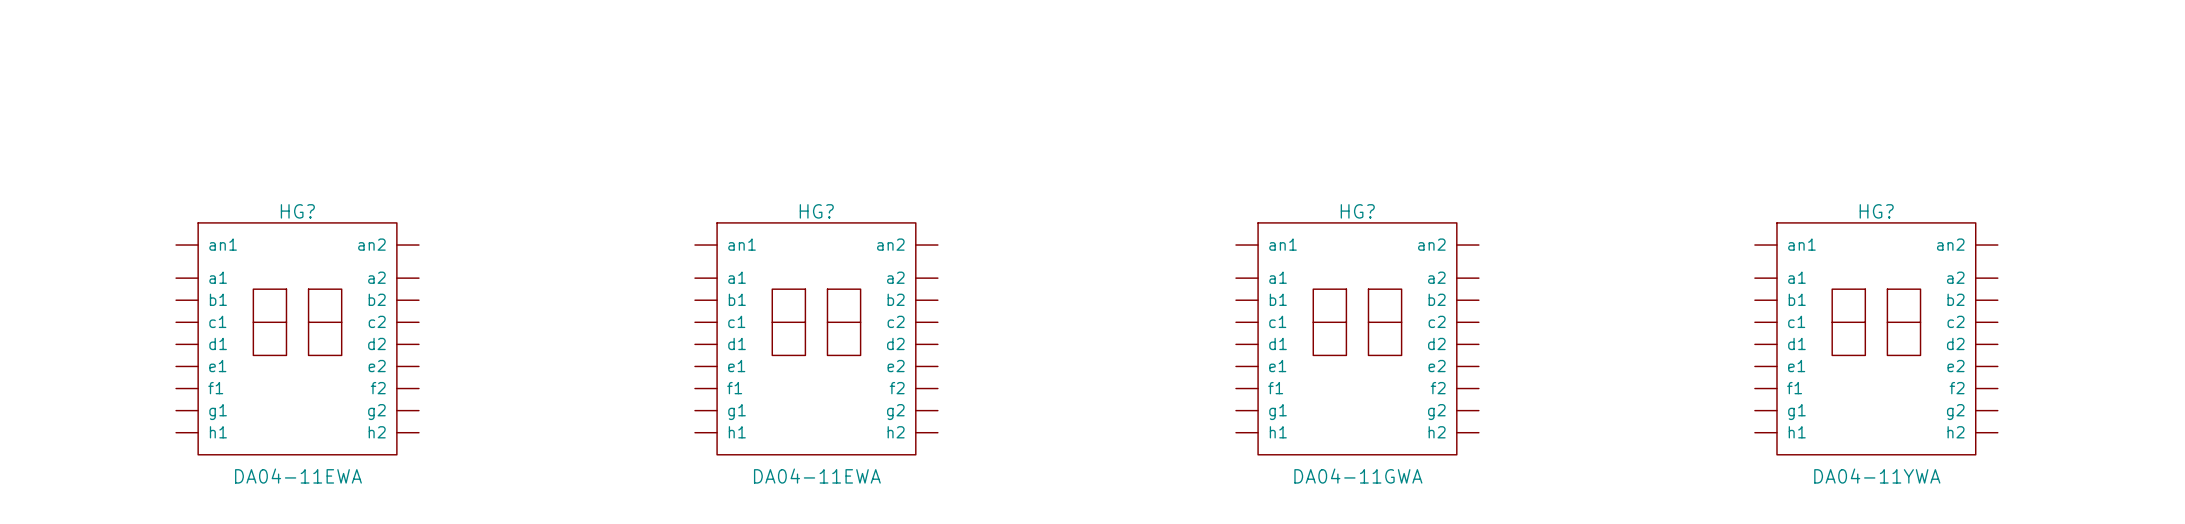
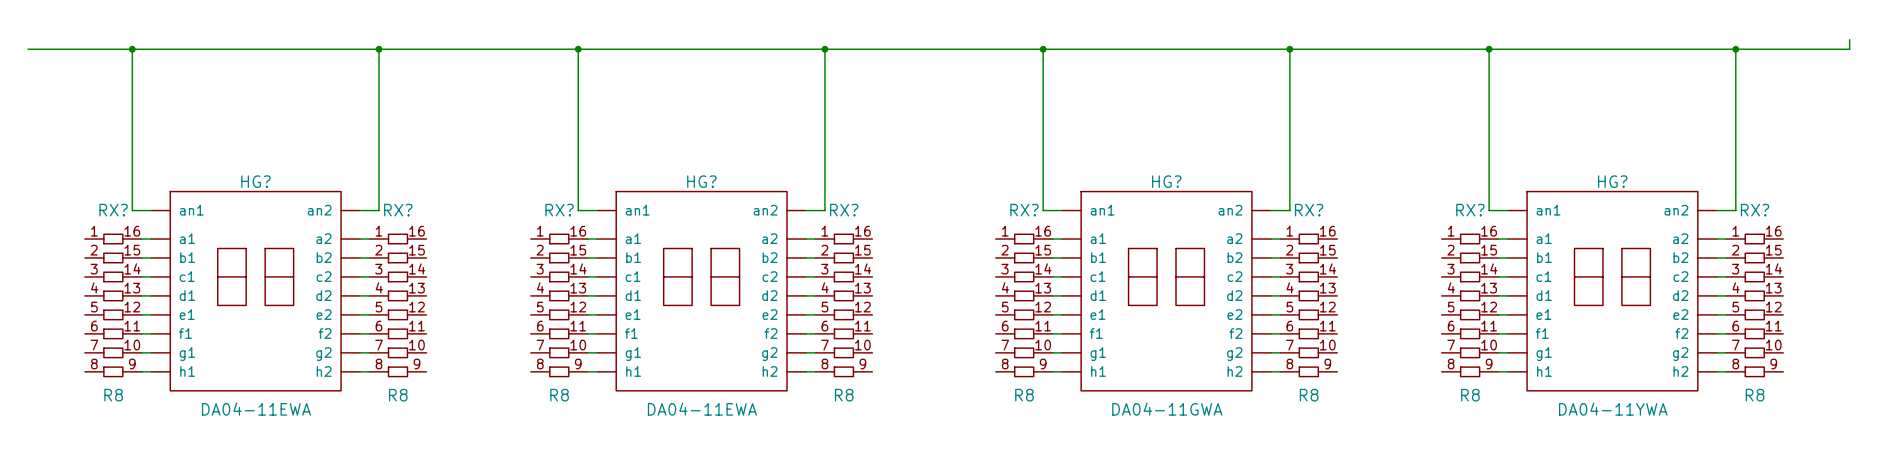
wire: none -> (1849, 39) (1849, 49) (27, 49)
wire: none -> (132, 49) (132, 210) (151, 210)
junction: none -> (132, 49)
wire: none -> (379, 49) (379, 210) (360, 210)
junction: none -> (379, 49)
wire: none -> (578, 49) (578, 210) (597, 210)
junction: none -> (578, 49)
wire: none -> (824, 49) (824, 210) (805, 210)
junction: none -> (824, 49)
wire: none -> (1043, 49) (1043, 210) (1062, 210)
junction: none -> (1043, 49)
wire: none -> (1289, 49) (1289, 210) (1270, 210)
junction: none -> (1289, 49)
wire: none -> (1489, 49) (1489, 210) (1508, 210)
junction: none -> (1489, 49)
wire: none -> (1735, 49) (1735, 210) (1716, 210)
junction: none -> (1735, 49)
wire: none -> (141, 239) (151, 239)
wire: none -> (360, 239) (369, 239)
wire: none -> (587, 239) (597, 239)
wire: none -> (805, 239) (815, 239)
wire: none -> (1052, 239) (1062, 239)
wire: none -> (1270, 239) (1280, 239)
wire: none -> (1498, 239) (1508, 239)
wire: none -> (1716, 239) (1726, 239)
wire: none -> (141, 257) (151, 257)
wire: none -> (360, 257) (369, 257)
wire: none -> (587, 257) (597, 257)
wire: none -> (805, 257) (815, 257)
wire: none -> (1052, 257) (1062, 257)
wire: none -> (1270, 257) (1280, 257)
wire: none -> (1498, 257) (1508, 257)
wire: none -> (1716, 257) (1726, 257)
wire: none -> (141, 276) (151, 276)
wire: none -> (360, 276) (369, 276)
wire: none -> (587, 276) (597, 276)
wire: none -> (805, 276) (815, 276)
wire: none -> (1052, 276) (1062, 276)
wire: none -> (1270, 276) (1280, 276)
wire: none -> (1498, 276) (1508, 276)
wire: none -> (1716, 276) (1726, 276)
wire: none -> (141, 295) (151, 295)
wire: none -> (360, 295) (369, 295)
wire: none -> (587, 295) (597, 295)
wire: none -> (805, 295) (815, 295)
wire: none -> (1052, 295) (1062, 295)
wire: none -> (1270, 295) (1280, 295)
wire: none -> (1498, 295) (1508, 295)
wire: none -> (1716, 295) (1726, 295)
RX?: none -> R8 (113, 305)
RX?: none -> R8 (397, 305)
RX?: none -> R8 (559, 305)
RX?: none -> R8 (843, 305)
RX?: none -> R8 (1024, 305)
RX?: none -> R8 (1308, 305)
RX?: none -> R8 (1470, 305)
RX?: none -> R8 (1754, 305)
wire: none -> (141, 314) (151, 314)
wire: none -> (360, 314) (369, 314)
wire: none -> (587, 314) (597, 314)
wire: none -> (805, 314) (815, 314)
wire: none -> (1052, 314) (1062, 314)
wire: none -> (1270, 314) (1280, 314)
wire: none -> (1498, 314) (1508, 314)
wire: none -> (1716, 314) (1726, 314)
wire: none -> (141, 333) (151, 333)
wire: none -> (360, 333) (369, 333)
wire: none -> (587, 333) (597, 333)
wire: none -> (805, 333) (815, 333)
wire: none -> (1052, 333) (1062, 333)
wire: none -> (1270, 333) (1280, 333)
wire: none -> (1498, 333) (1508, 333)
wire: none -> (1716, 333) (1726, 333)
wire: none -> (141, 352) (151, 352)
wire: none -> (360, 352) (369, 352)
wire: none -> (587, 352) (597, 352)
wire: none -> (805, 352) (815, 352)
wire: none -> (1052, 352) (1062, 352)
wire: none -> (1270, 352) (1280, 352)
wire: none -> (1498, 352) (1508, 352)
wire: none -> (1716, 352) (1726, 352)
wire: none -> (141, 371) (151, 371)
wire: none -> (360, 371) (369, 371)
wire: none -> (587, 371) (597, 371)
wire: none -> (805, 371) (815, 371)
wire: none -> (1052, 371) (1062, 371)
wire: none -> (1270, 371) (1280, 371)
wire: none -> (1498, 371) (1508, 371)
wire: none -> (1716, 371) (1726, 371)

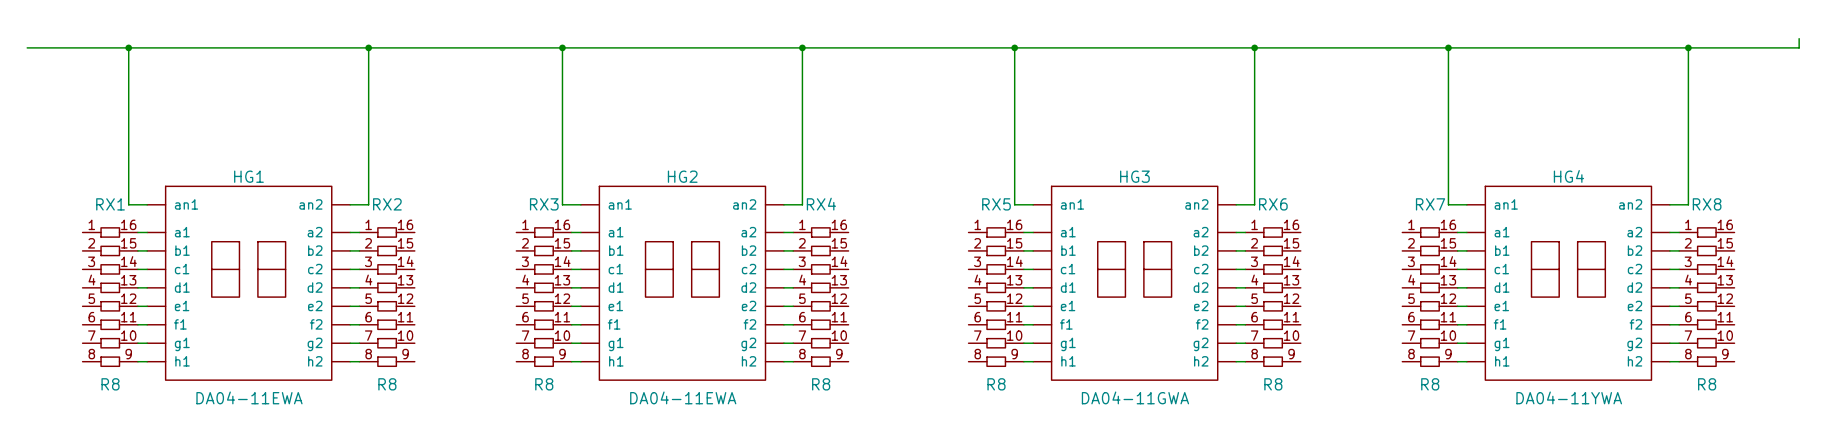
HG? name: HG? (255, 181) -> HG1 (248, 176)
HG? name: HG? (701, 181) -> HG2 (682, 176)
HG? name: HG? (1166, 181) -> HG3 (1134, 176)
HG? name: HG? (1612, 181) -> HG4 (1568, 176)
RX? name: RX? (113, 210) -> RX1 (110, 204)
RX? name: RX? (398, 210) -> RX2 (387, 204)
RX? name: RX? (559, 210) -> RX3 (544, 204)
RX? name: RX? (844, 210) -> RX4 (821, 204)
RX? name: RX? (1024, 210) -> RX5 (996, 204)
RX? name: RX? (1309, 210) -> RX6 (1273, 204)
RX? name: RX? (1470, 210) -> RX7 (1430, 204)
RX? name: RX? (1755, 210) -> RX8 (1707, 204)

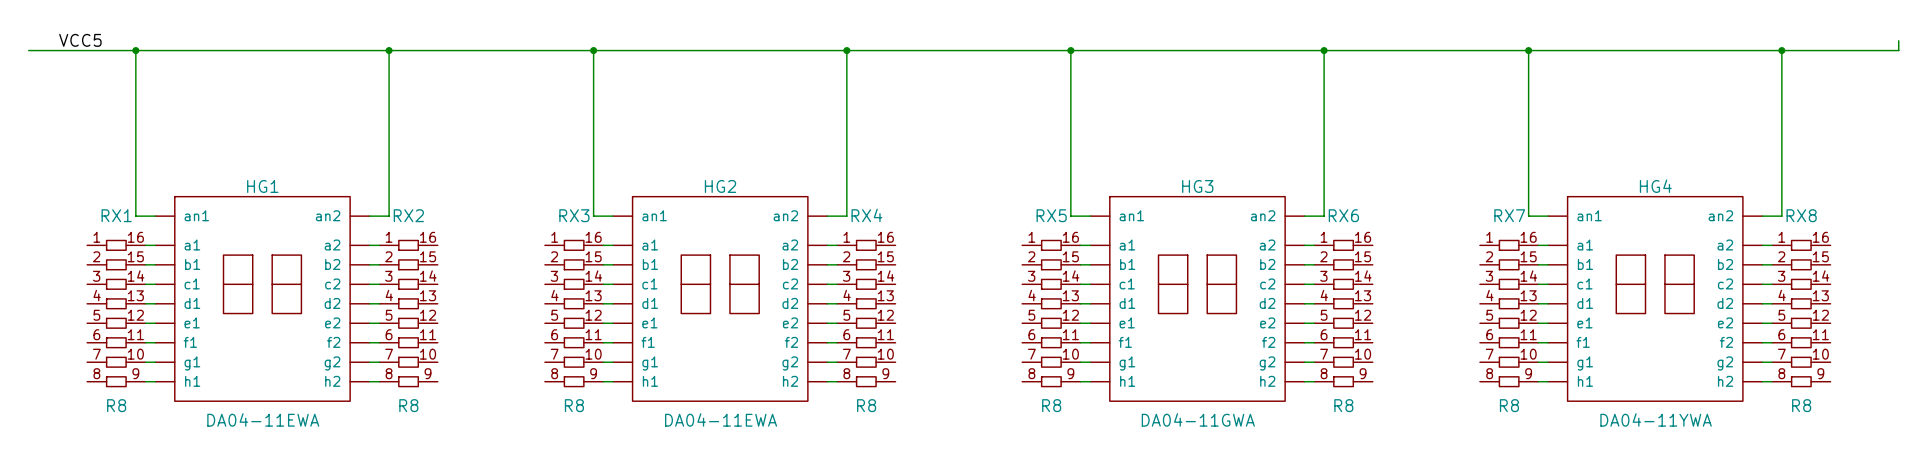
label: none -> VCC5 (80, 40)

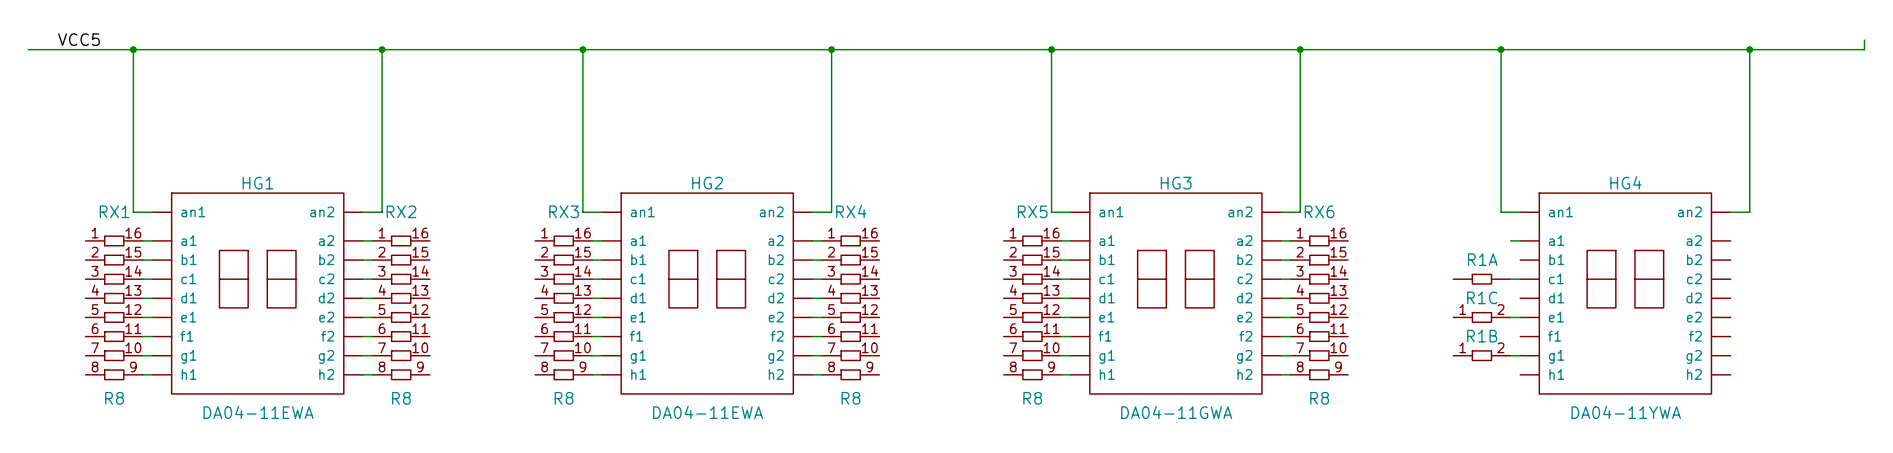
wire: (1762, 245) (1772, 245) -> none
wire: (1538, 264) (1548, 264) -> none
wire: (1762, 264) (1772, 264) -> none
R1A: none -> (1481, 279)
wire: (1762, 284) (1772, 284) -> none
wire: (1538, 303) (1548, 303) -> none
wire: (1762, 303) (1772, 303) -> none
RX7: R8 (1509, 313) -> none
RX8: R8 (1801, 313) -> none
R1C: none -> (1481, 317)
wire: (1762, 323) (1772, 323) -> none
wire: (1538, 342) (1548, 342) -> none
wire: (1762, 342) (1772, 342) -> none
R1B: none -> (1481, 355)
wire: (1762, 362) (1772, 362) -> none
wire: (1538, 381) (1548, 381) -> none
wire: (1762, 381) (1772, 381) -> none

